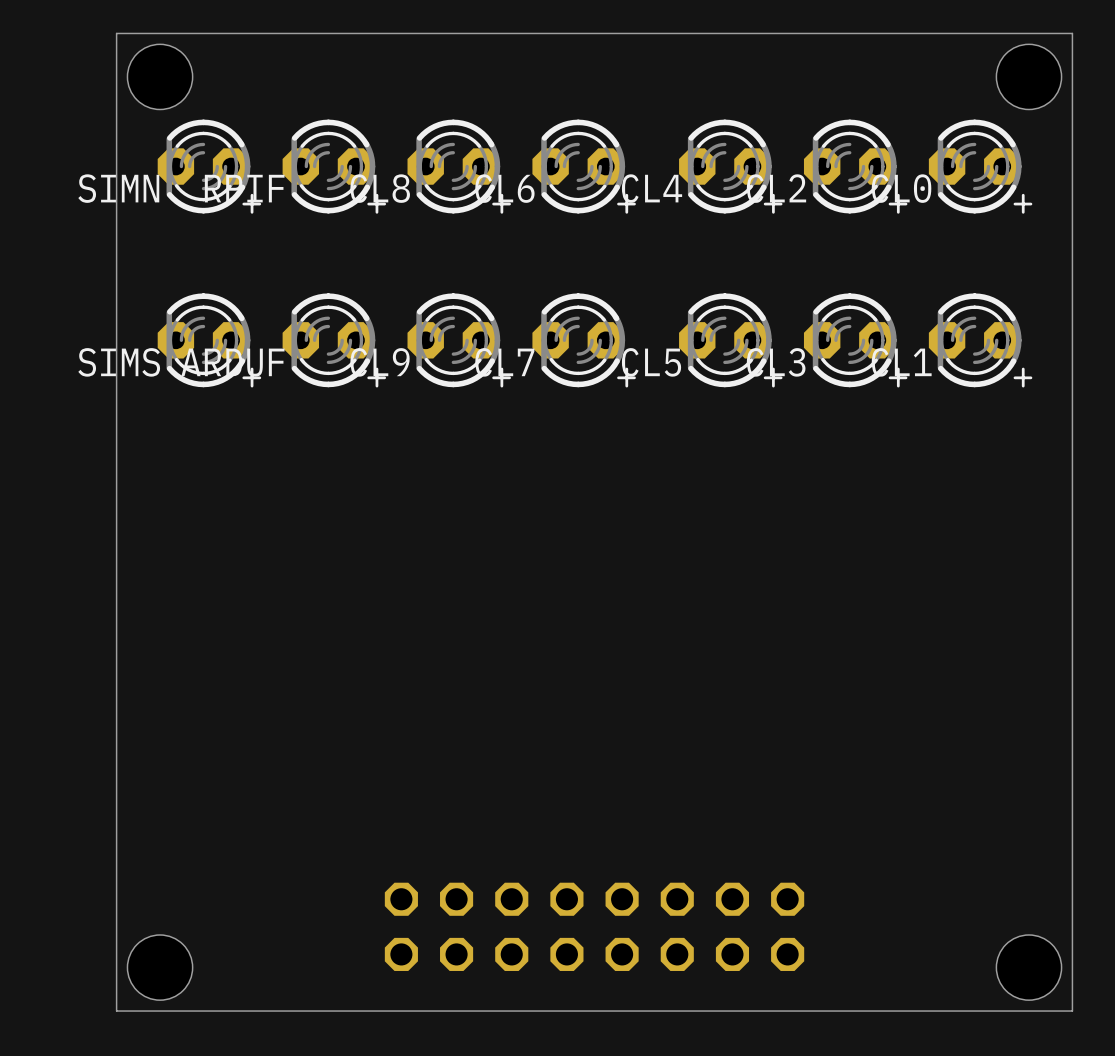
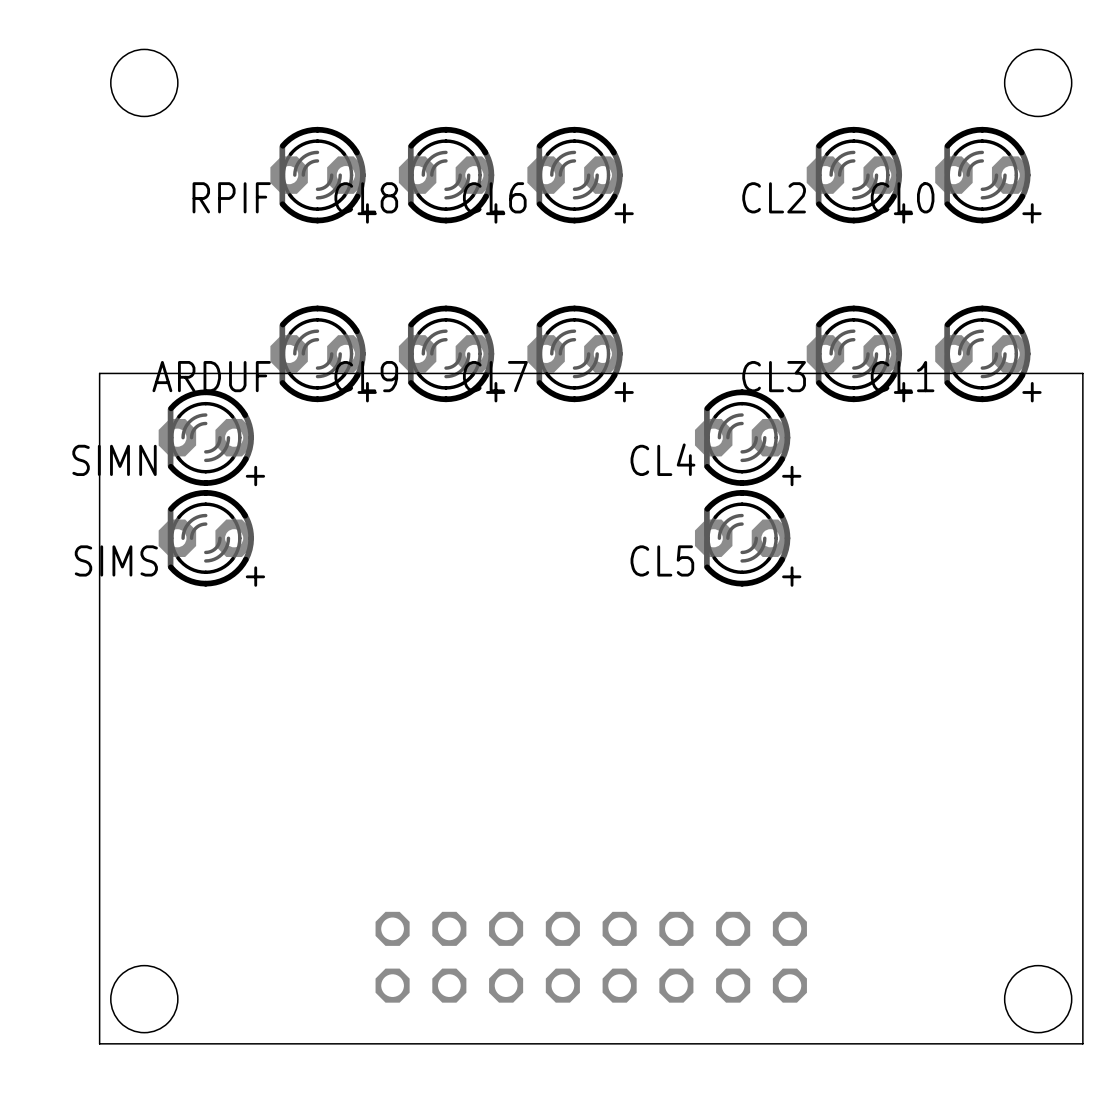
SIMN position: (209, 166) -> (211, 437)
CL4 position: (730, 166) -> (748, 437)
SIMS position: (209, 340) -> (211, 538)
CL5 position: (730, 340) -> (748, 538)
board edge: (116, 359) (116, 33) (1072, 33) (1072, 359) -> (99, 373) (1082, 373)

